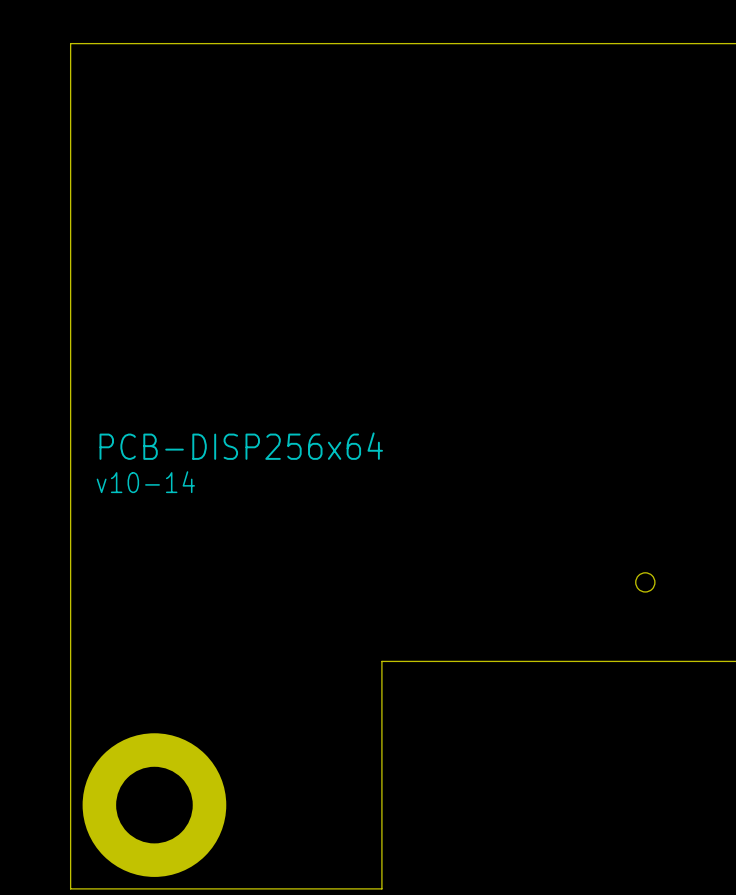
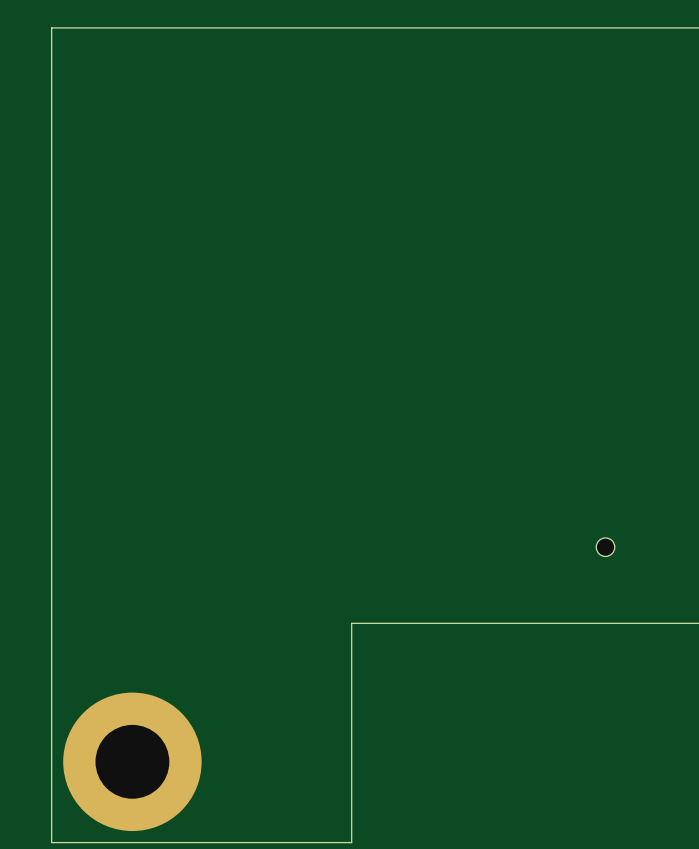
text: PCB-DISP256x64 (241, 446) -> none
text: v10-14 (145, 482) -> none

